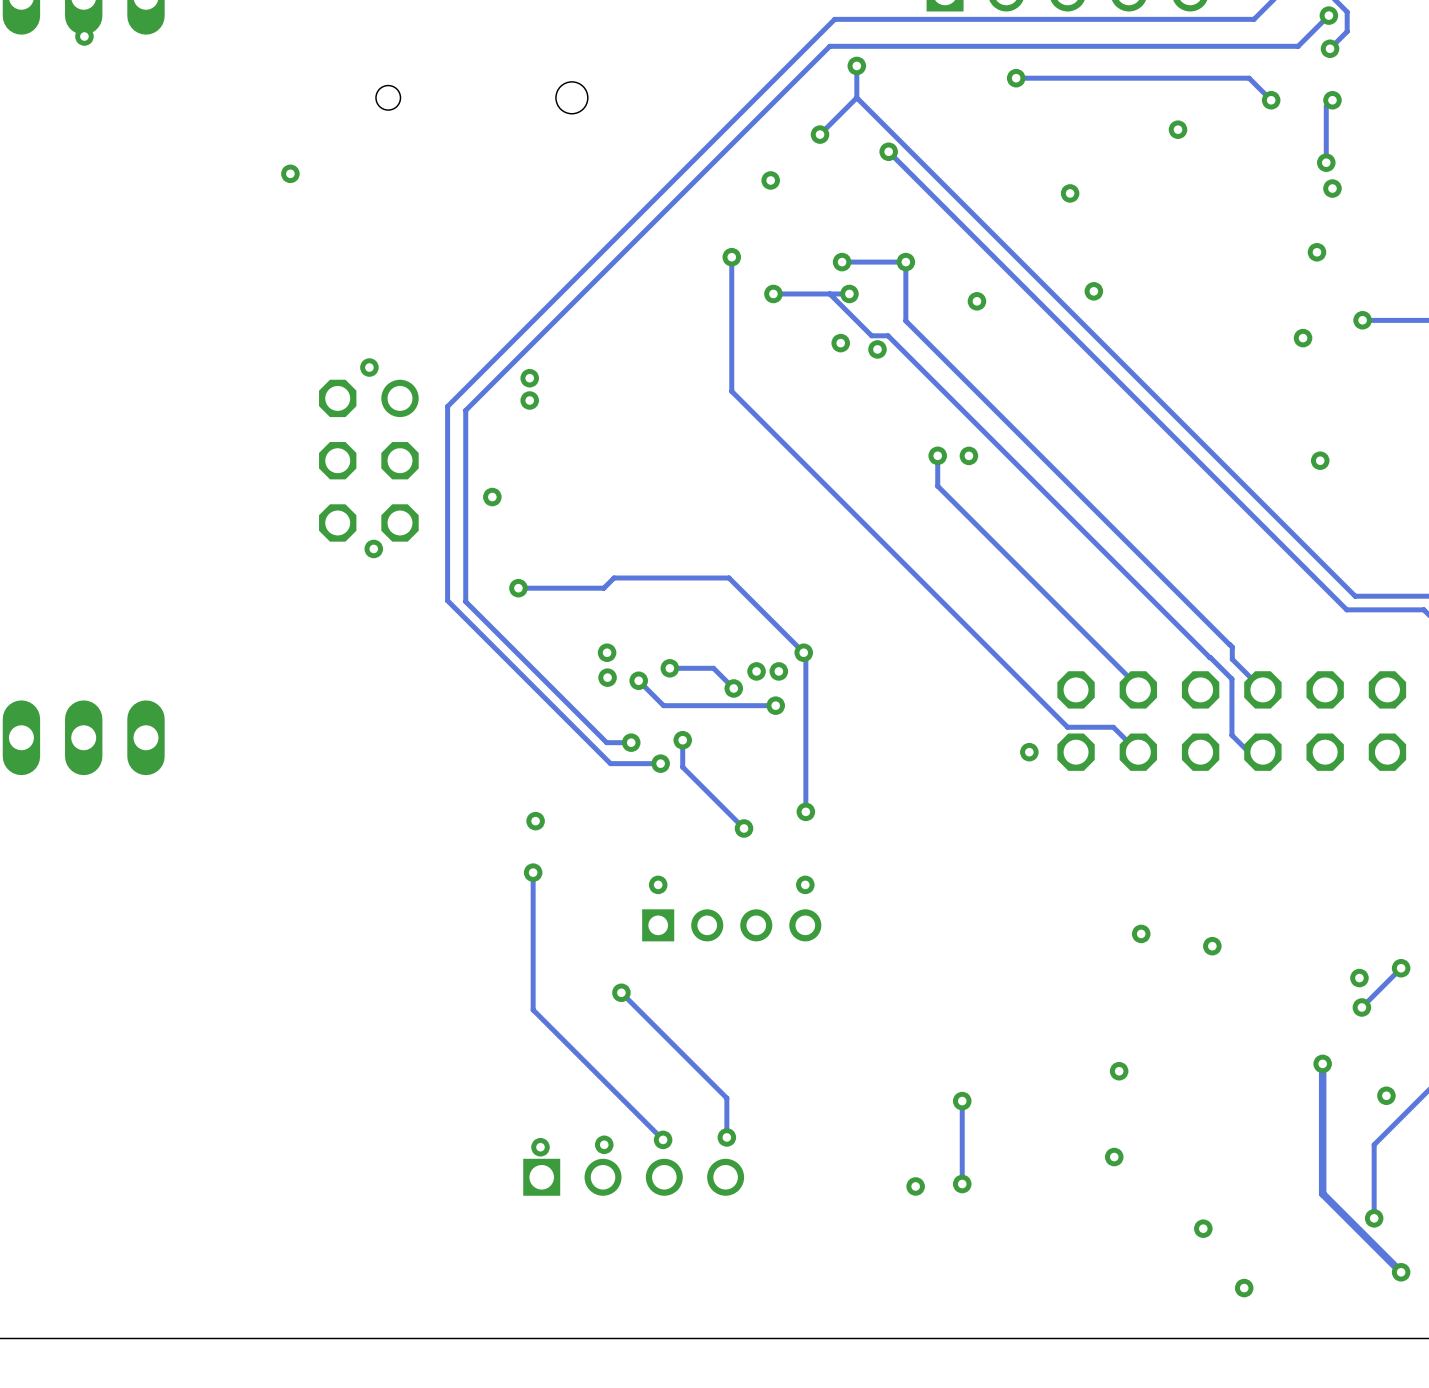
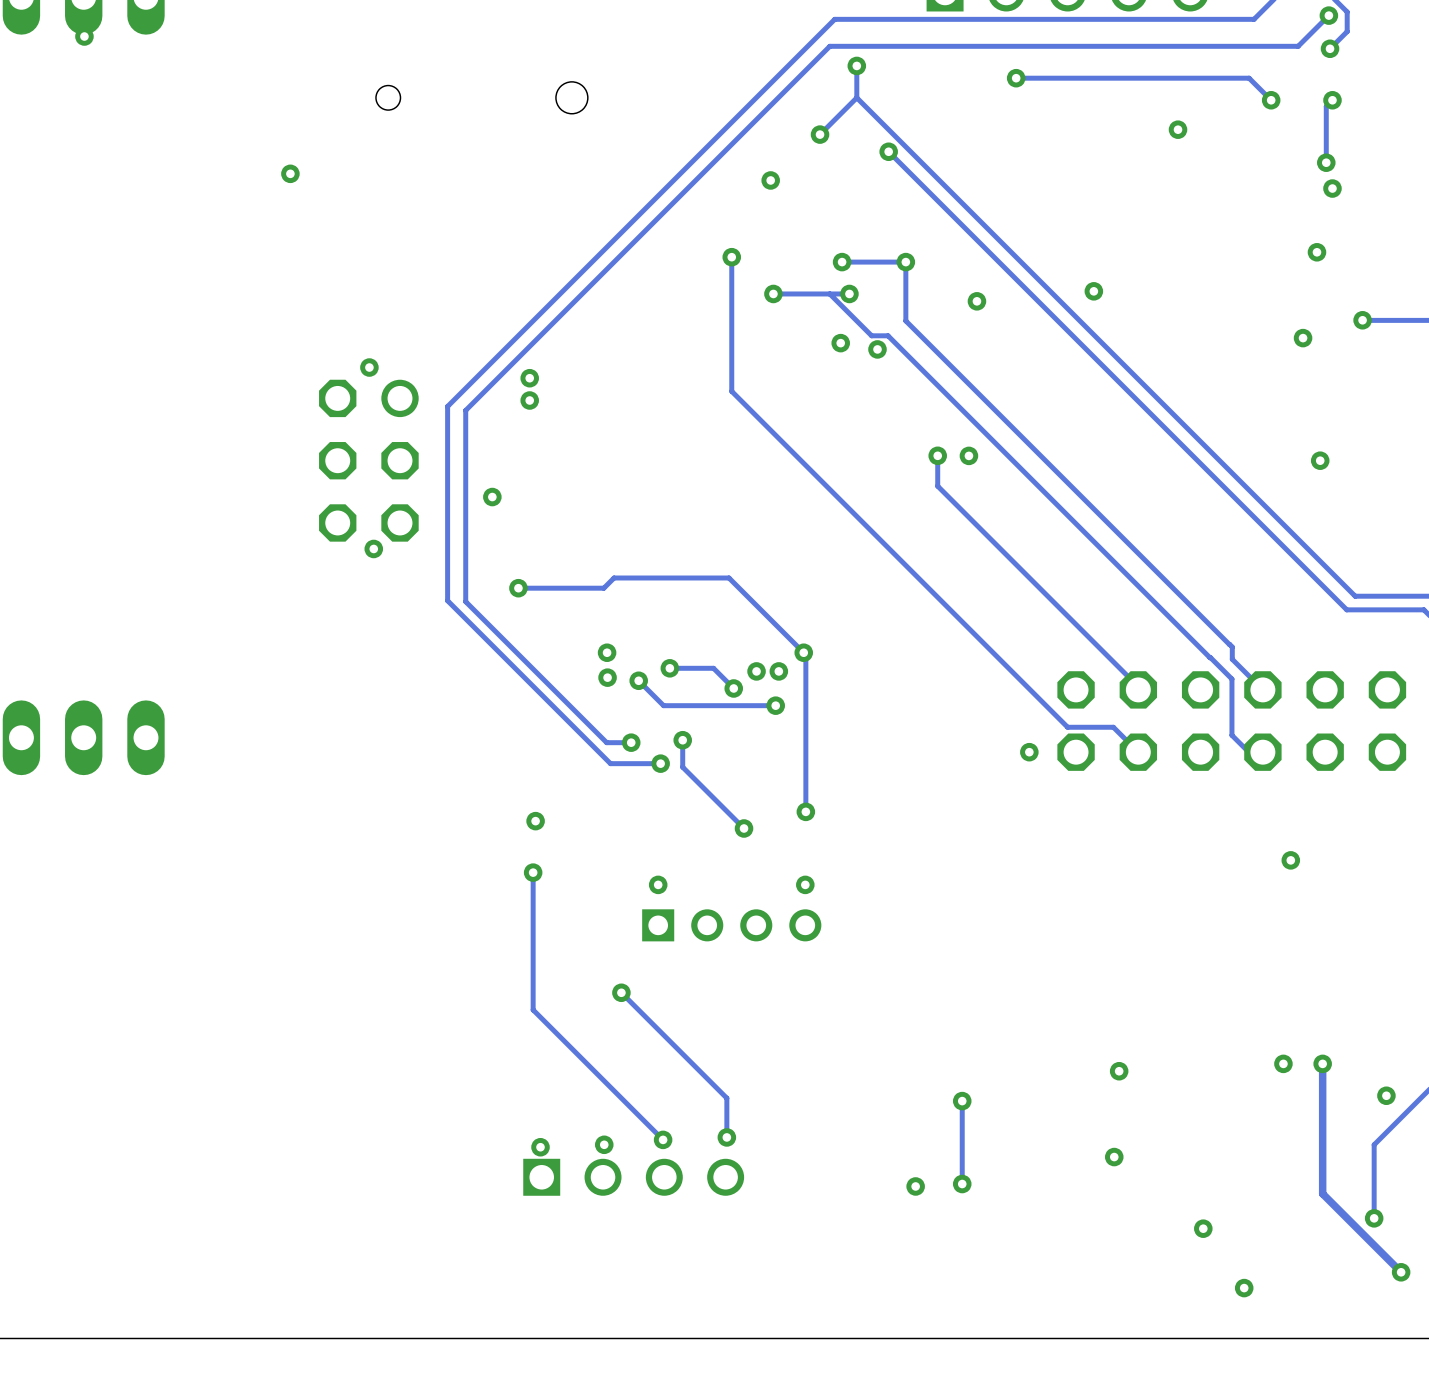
via: (1070, 193) -> none
via: none -> (1290, 860)
via: (1141, 933) -> none
via: (1212, 946) -> none
track: (1401, 968) (1361, 1007) -> none
via: (1401, 968) -> none
via: (1359, 978) -> none
via: (1361, 1007) -> none
via: none -> (1283, 1063)

